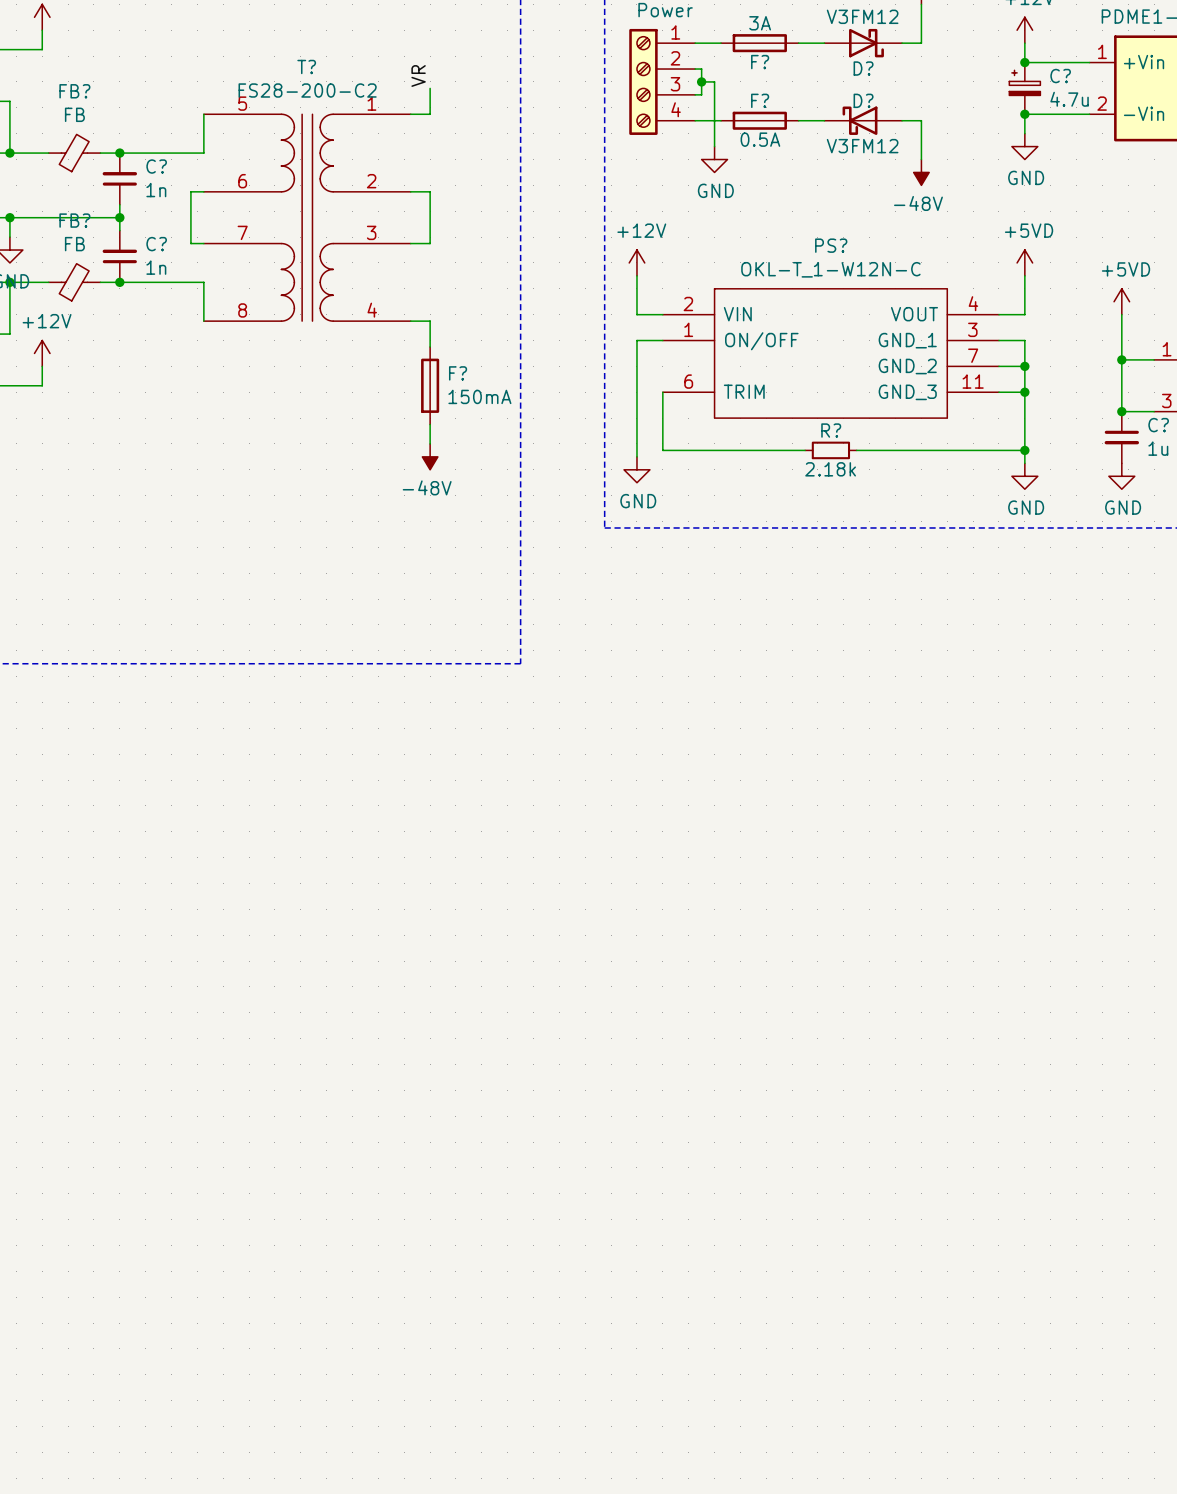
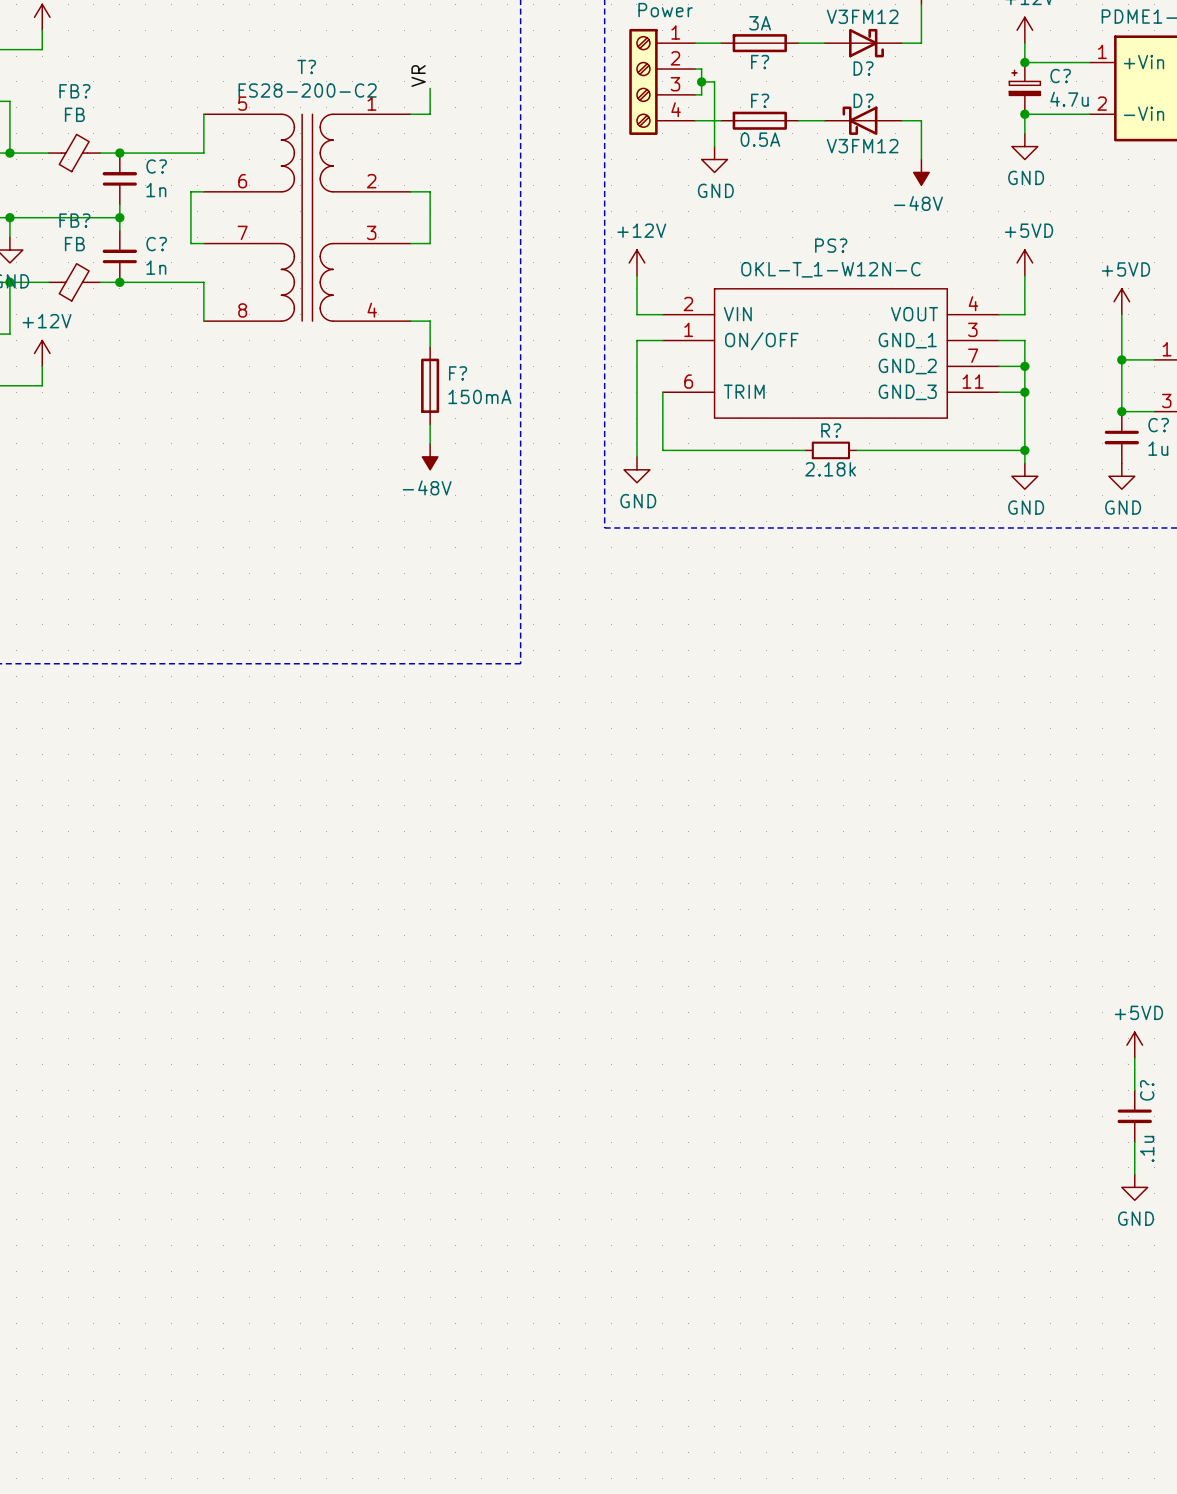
power symbol: none -> +5VD (1134, 1045)
wire: none -> (1134, 1058) (1134, 1090)
C?: none -> .1u (1134, 1116)
wire: none -> (1134, 1142) (1134, 1174)
power symbol: none -> GND (1134, 1187)

